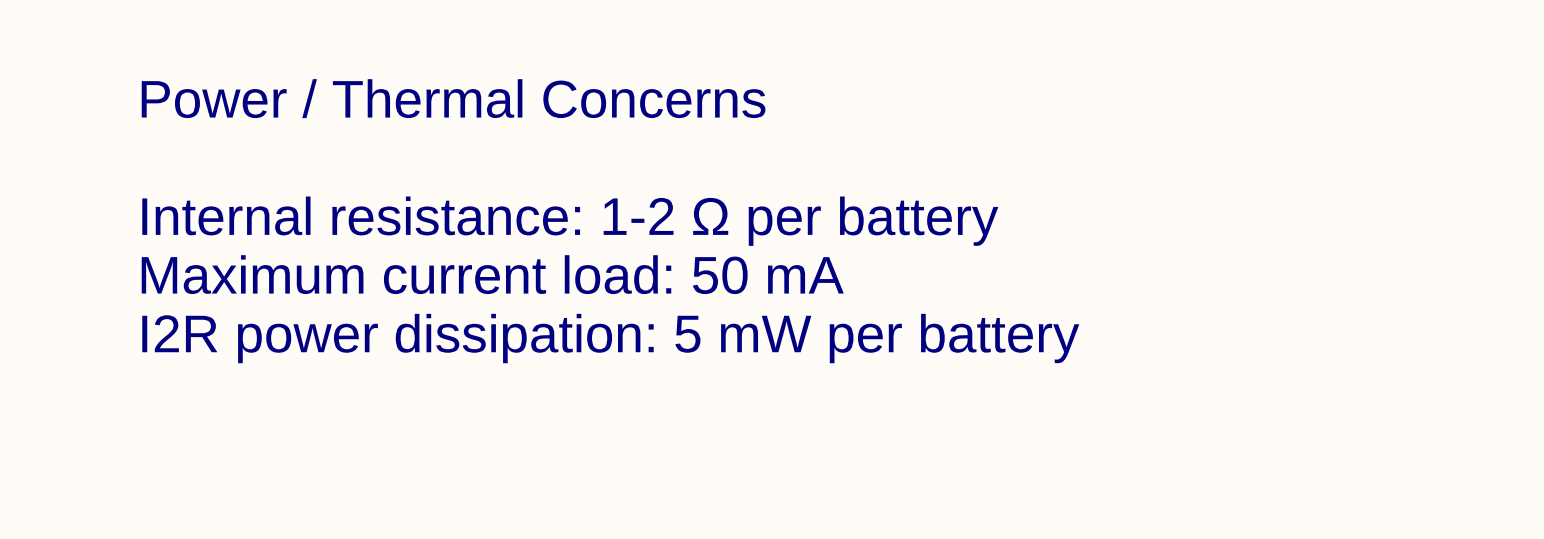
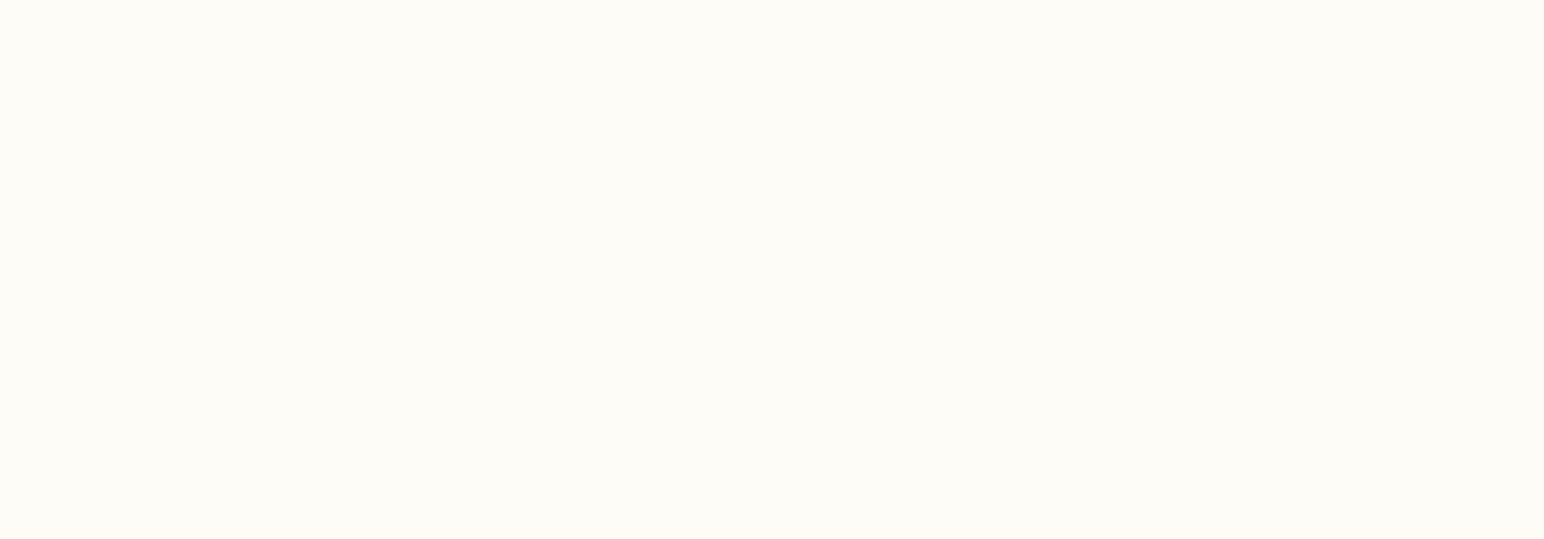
text: Power / Thermal Concerns (453, 98) -> none
text: Internal resistance: 1-2 Ω per battery (570, 221) -> none
text: Maximum current load: 50 mA (492, 274) -> none
text: I2R power dissipation: 5 mW per battery (610, 338) -> none

